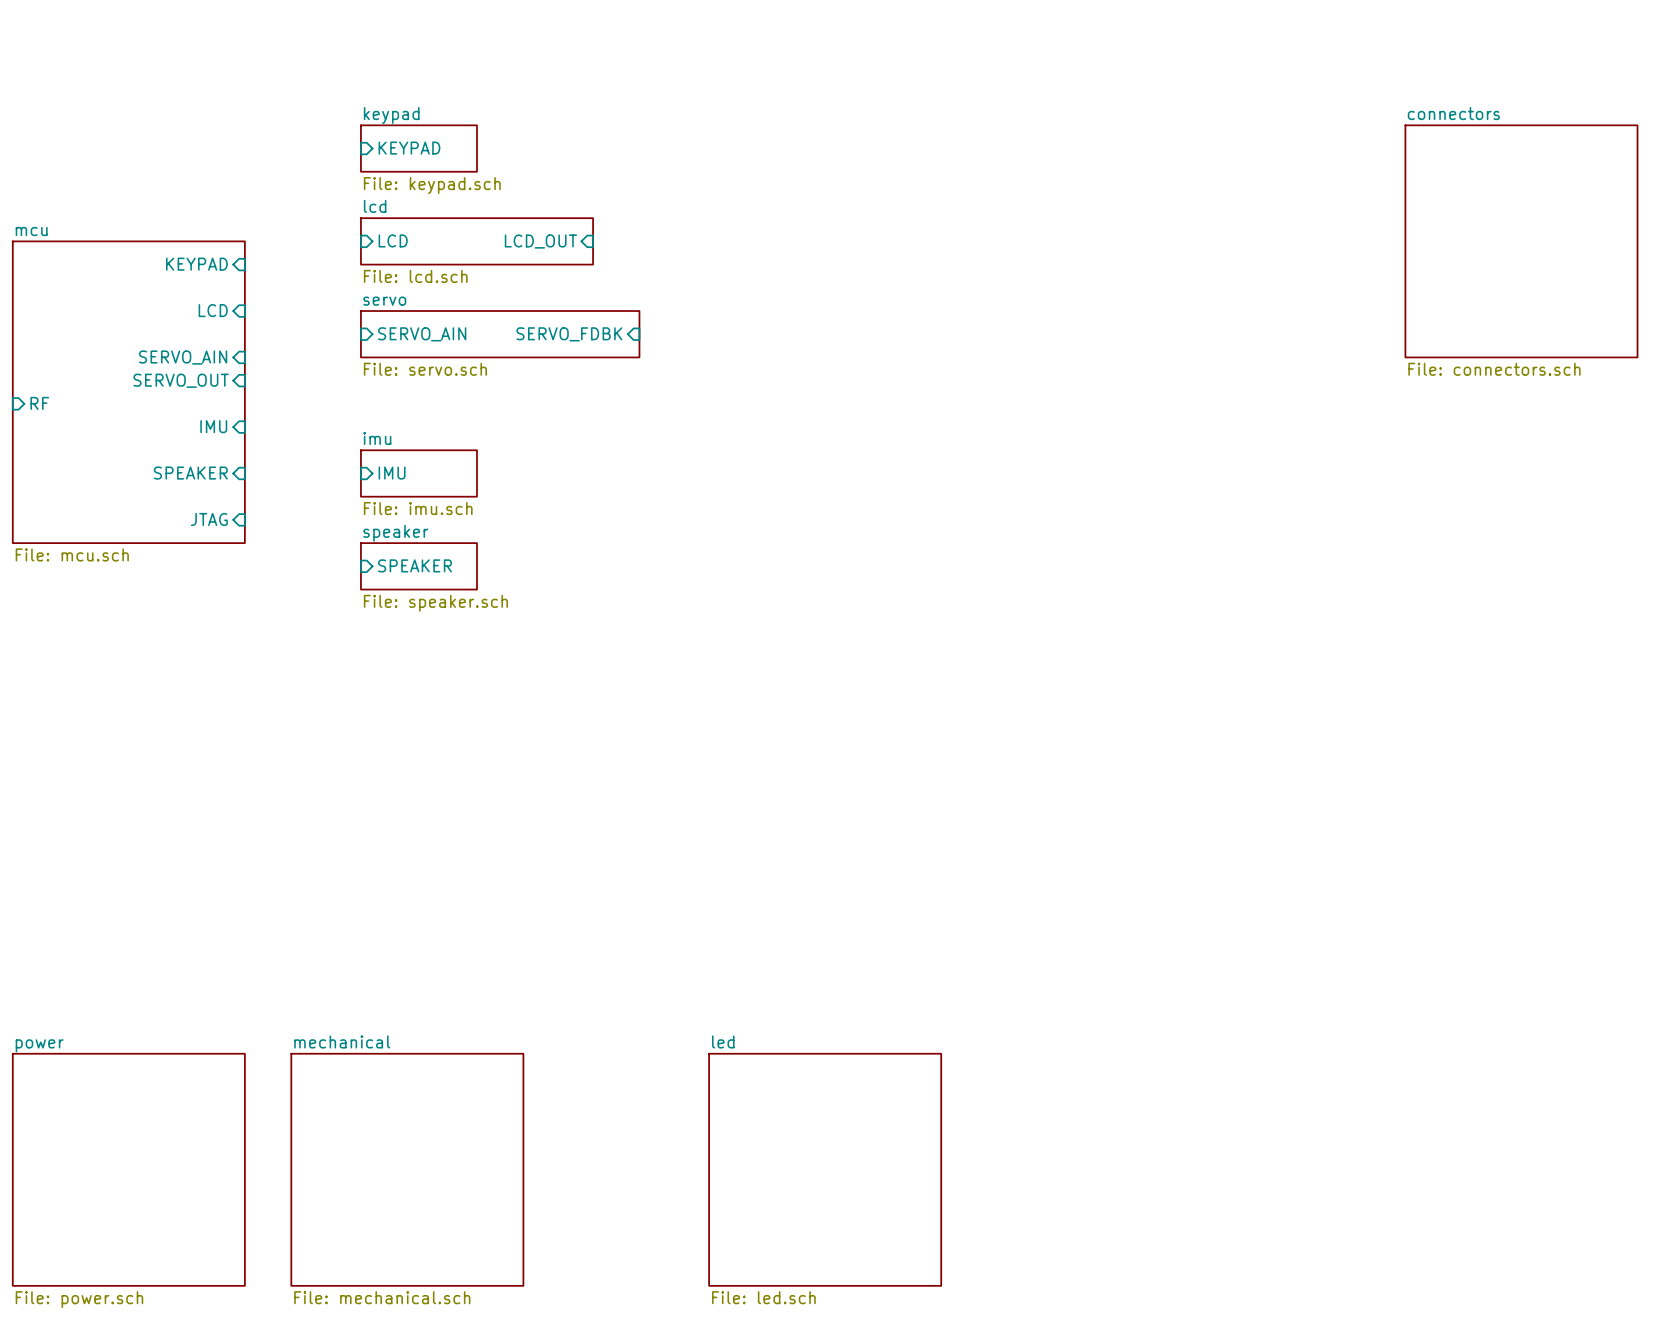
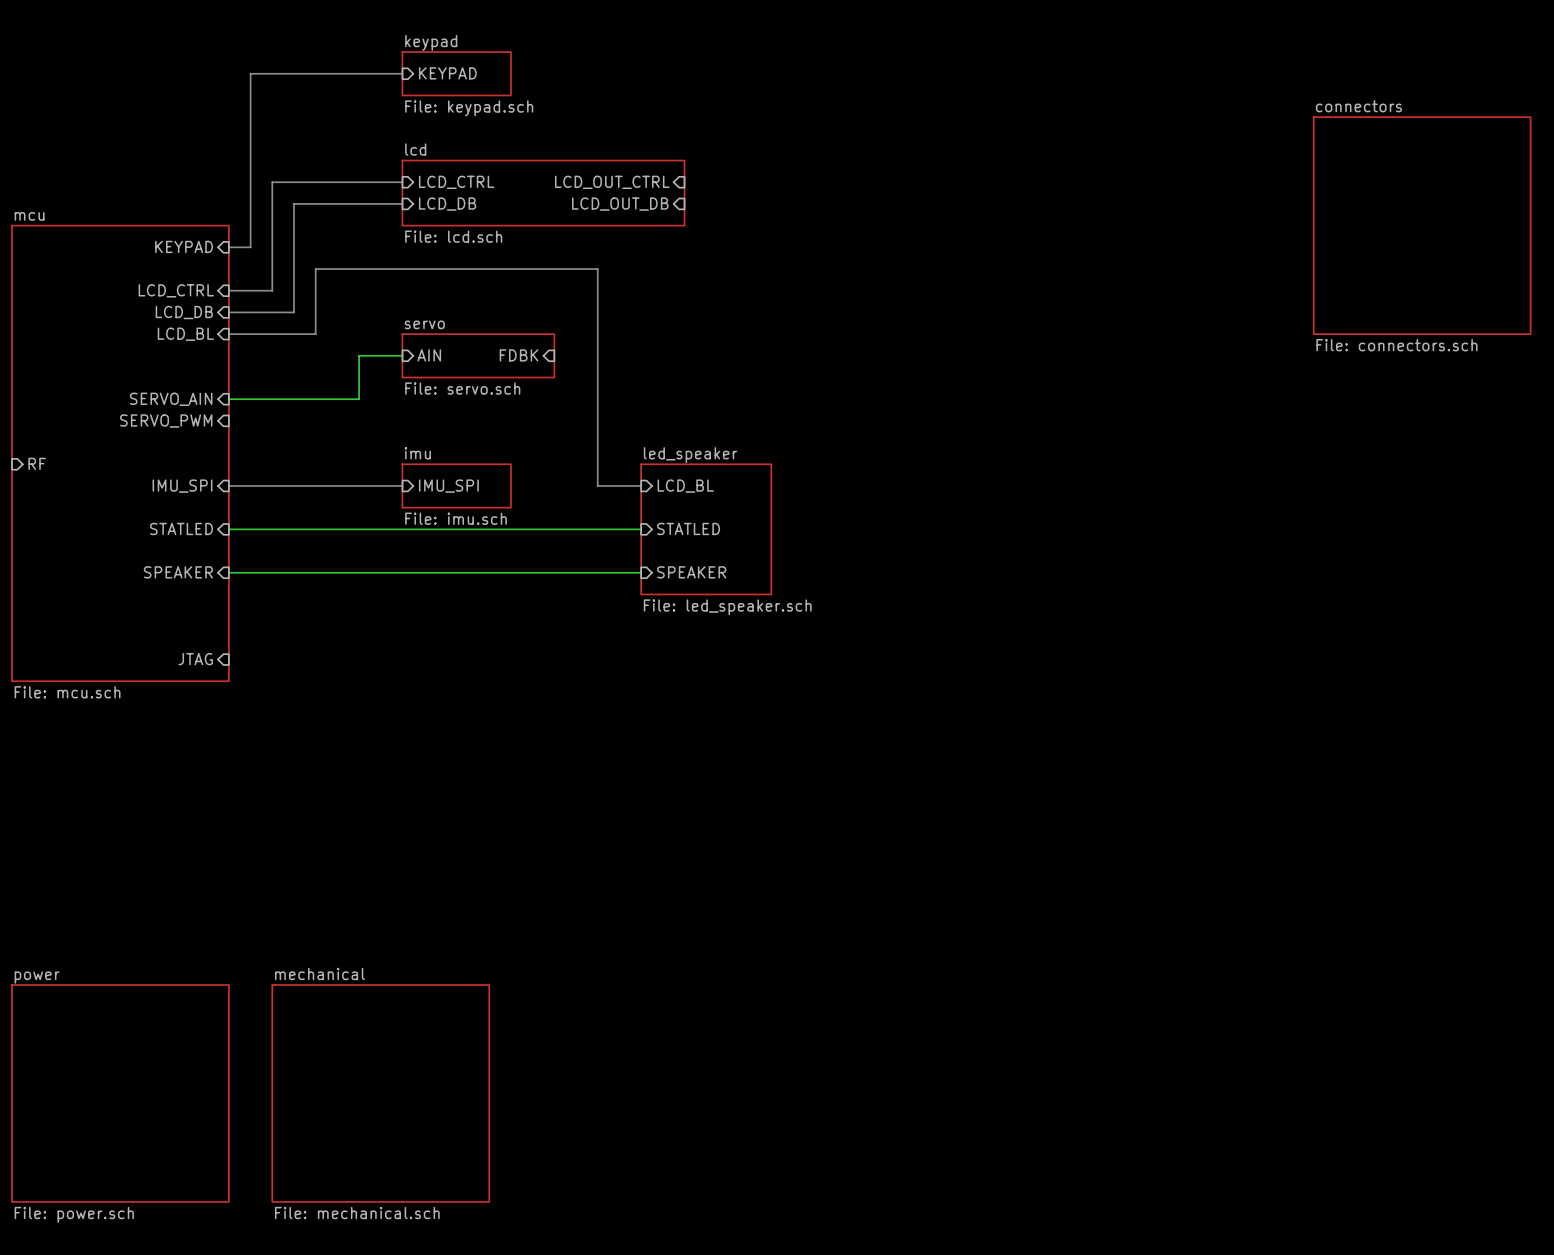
bus: none -> (402, 73) (250, 73) (250, 247) (228, 247)
sheet pin position: KEYPAD (409, 148) -> KEYPAD (447, 73)
sheet keypad position: (418, 148) -> (456, 73)
bus: none -> (402, 182) (272, 182) (272, 290) (228, 290)
sheet pin: none -> LCD_CTRL (456, 182)
sheet pin: none -> LCD_OUT_CTRL (612, 182)
sheet lcd: none -> File: lcd.sch (543, 193)
bus: none -> (402, 203) (294, 203) (294, 312) (228, 312)
sheet pin: none -> LCD_OUT_DB (620, 204)
sheet pin: LCD (393, 240) -> none
sheet lcd: File: lcd.sch (476, 241) -> none
sheet pin: LCD_OUT (540, 241) -> LCD_DB (447, 204)
sheet pin: LCD (213, 310) -> LCD_CTRL (176, 290)
sheet pin: none -> LCD_DB (184, 312)
sheet pin: SERVO_AIN (422, 334) -> none
sheet servo: File: servo.sch (500, 334) -> none
sheet pin: SERVO_FDBK (569, 334) -> none
sheet pin: SERVO_AIN (183, 357) -> LCD_BL (185, 334)
bus: none -> (228, 334) (315, 334) (315, 269) (597, 269) (597, 485) (641, 485)
sheet pin: SERVO_OUT (181, 380) -> none
wire: none -> (402, 355) (359, 355) (359, 399) (228, 399)
sheet pin: none -> AIN (429, 355)
sheet servo: none -> File: servo.sch (478, 355)
sheet pin: none -> FDBK (519, 355)
sheet mcu: File: mcu.sch (128, 392) -> none
sheet pin: RF (39, 403) -> none
sheet pin: IMU (213, 426) -> SERVO_AIN (171, 399)
sheet pin: none -> SERVO_PWM (166, 421)
sheet pin: SPEAKER (190, 473) -> none
sheet pin: IMU (392, 473) -> none
sheet imu position: (418, 473) -> (456, 485)
sheet mcu: none -> File: mcu.sch (120, 453)
sheet pin: none -> RF (37, 463)
sheet pin: JTAG (209, 519) -> IMU_SPI (182, 486)
bus: none -> (228, 485) (402, 485)
sheet pin: none -> IMU_SPI (448, 486)
sheet pin: none -> LCD_BL (685, 486)
sheet pin: none -> STATLED (181, 528)
sheet pin: SPEAKER (415, 565) -> none
sheet pin: none -> STATLED (688, 528)
wire: none -> (228, 529) (641, 529)
sheet speaker: File: speaker.sch (418, 566) -> none
sheet led_speaker: none -> File: led_speaker.sch (706, 529)
sheet pin: none -> SPEAKER (178, 572)
wire: none -> (228, 572) (641, 572)
sheet pin: none -> SPEAKER (691, 572)
sheet pin: none -> JTAG (195, 659)
sheet led: File: led.sch (825, 1169) -> none

